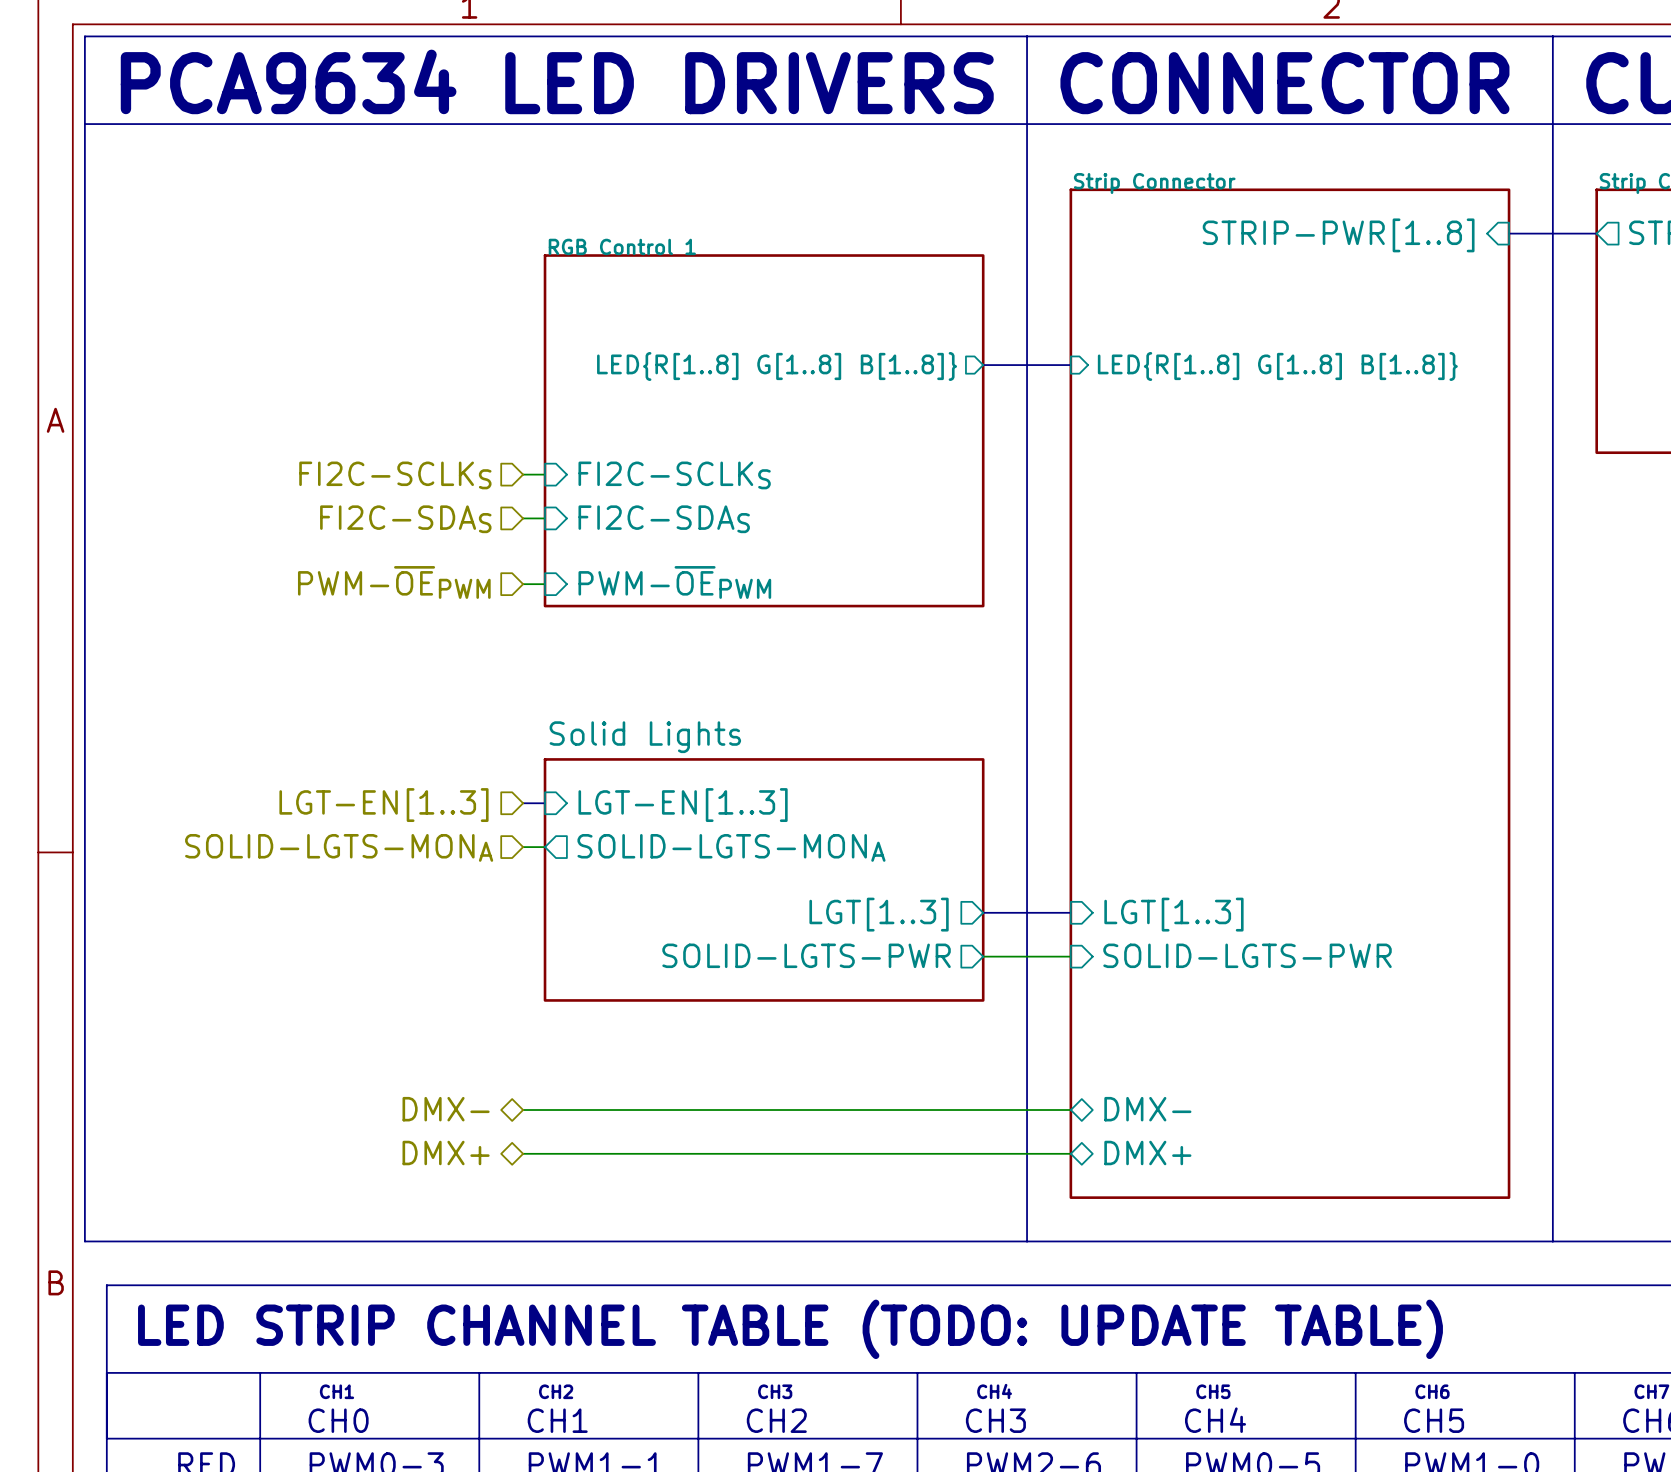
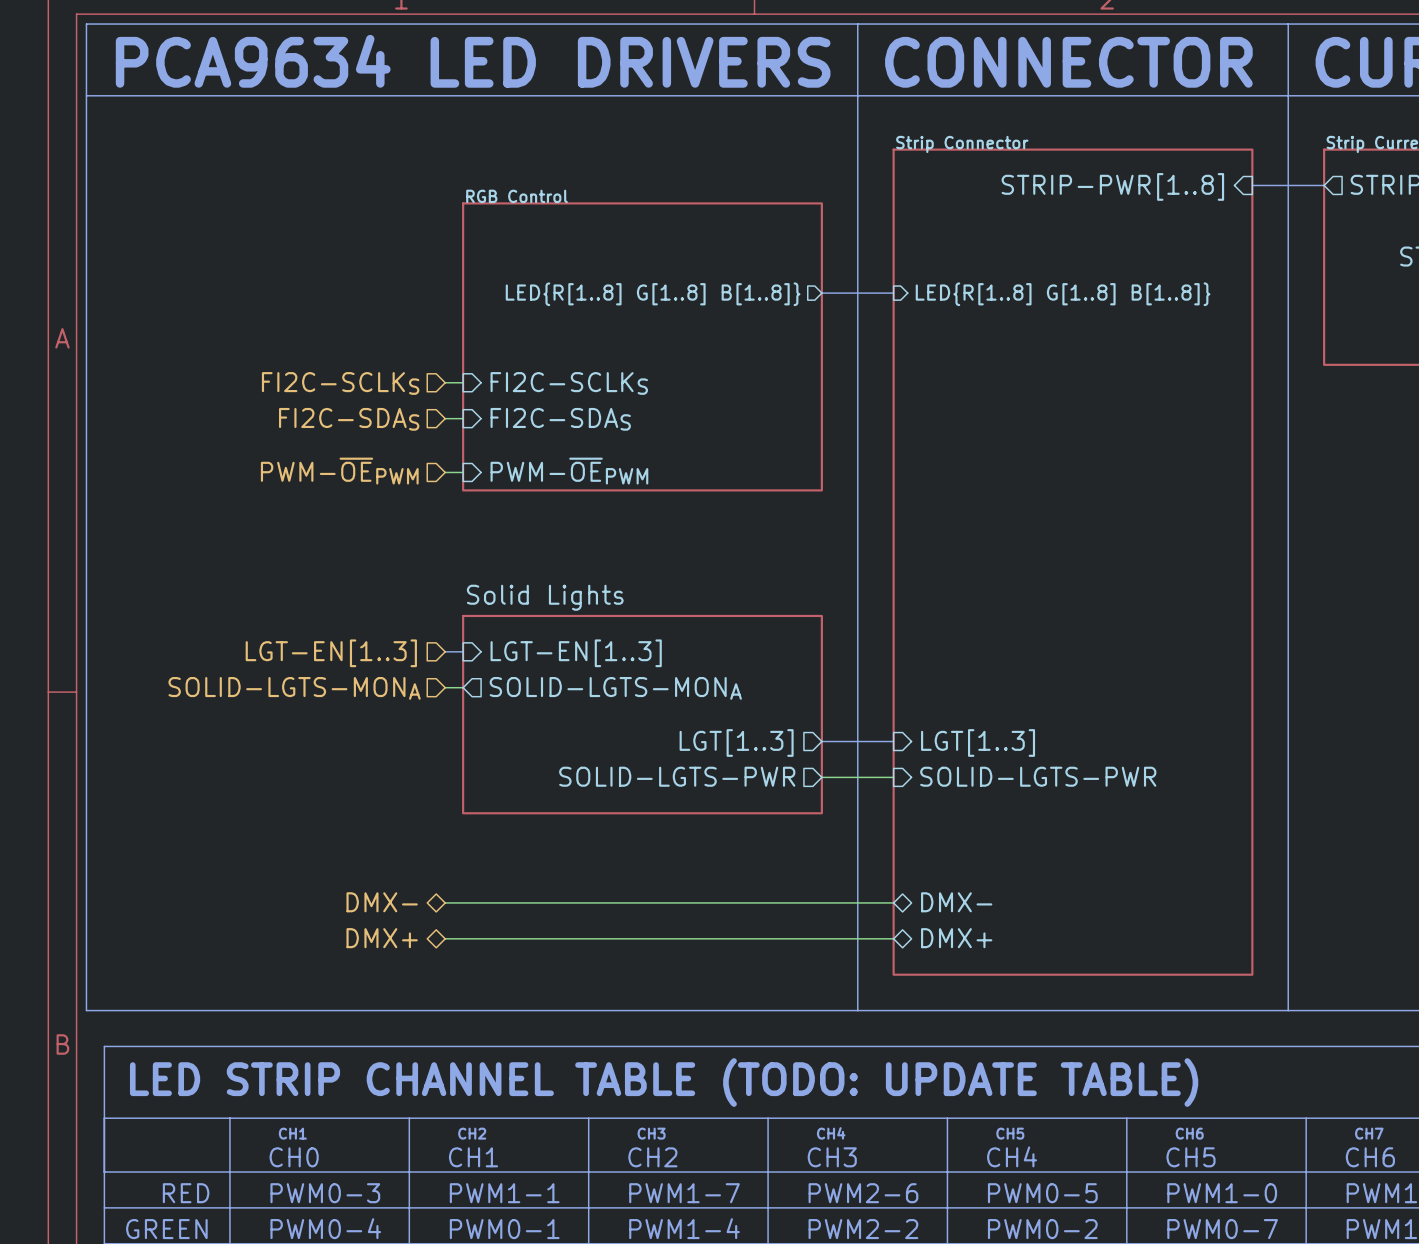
sheet RGB Control 1 name: RGB Control 1 (622, 246) -> RGB Control (517, 196)

